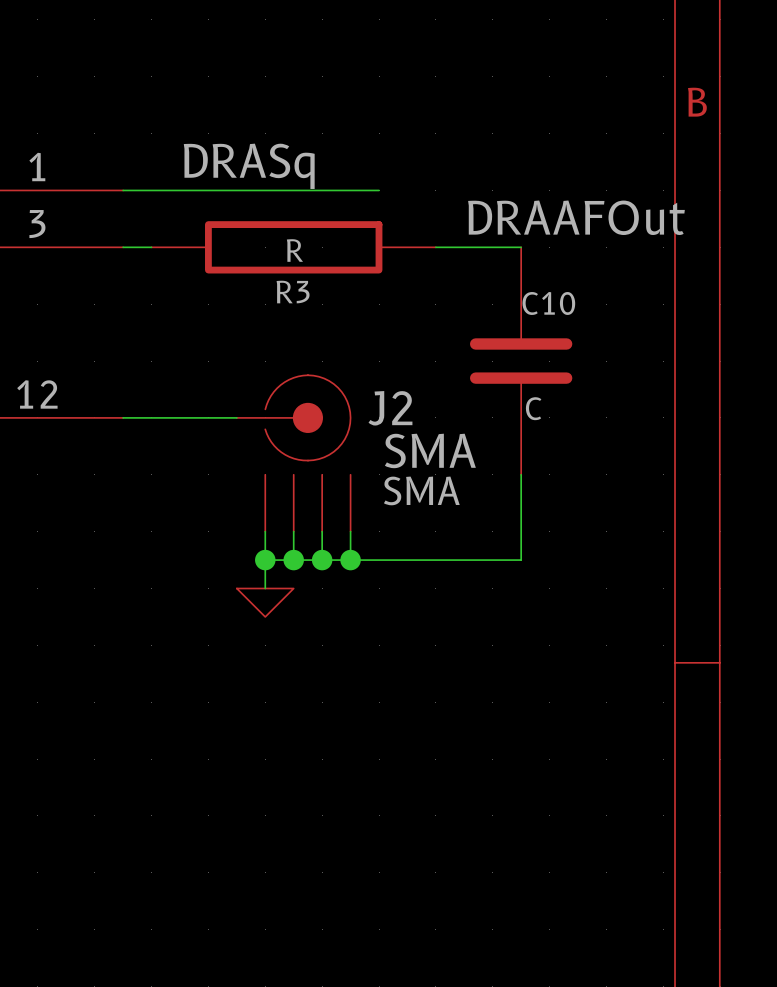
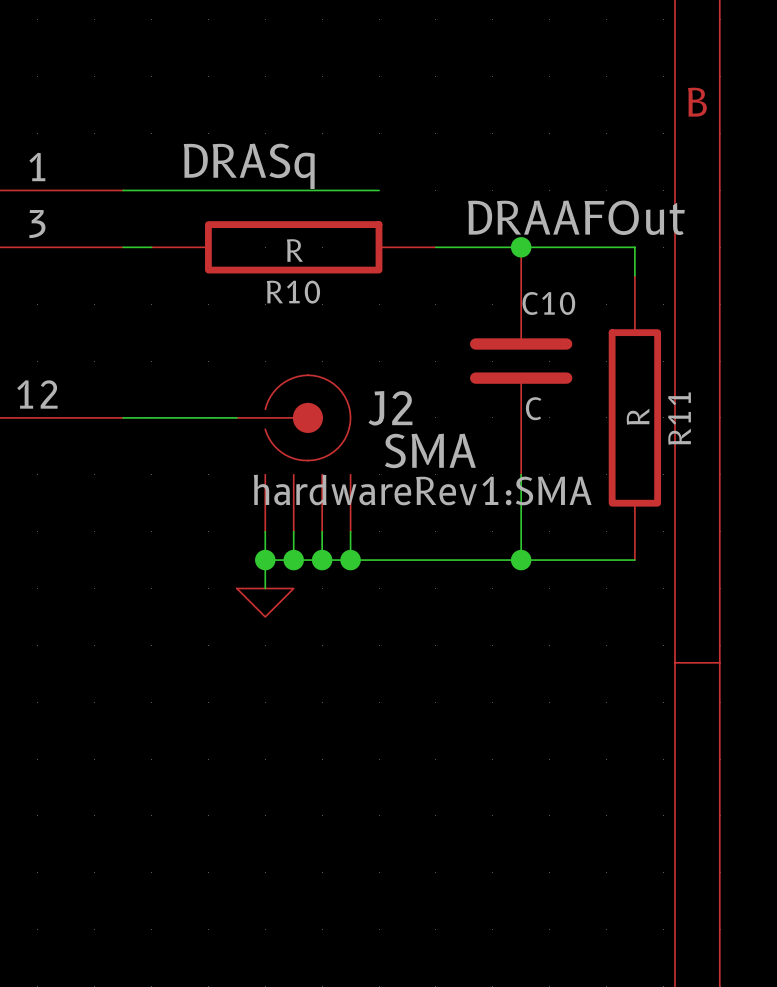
wire: none -> (521, 247) (634, 247) (634, 275)
junction: none -> (521, 247)
R3 name: R3 (293, 292) -> R10 (293, 292)
R11: none -> R (634, 417)
J2 text: SMA (421, 490) -> hardwareRev1:SMA (422, 490)
wire: none -> (521, 560) (634, 560)
junction: none -> (521, 560)

